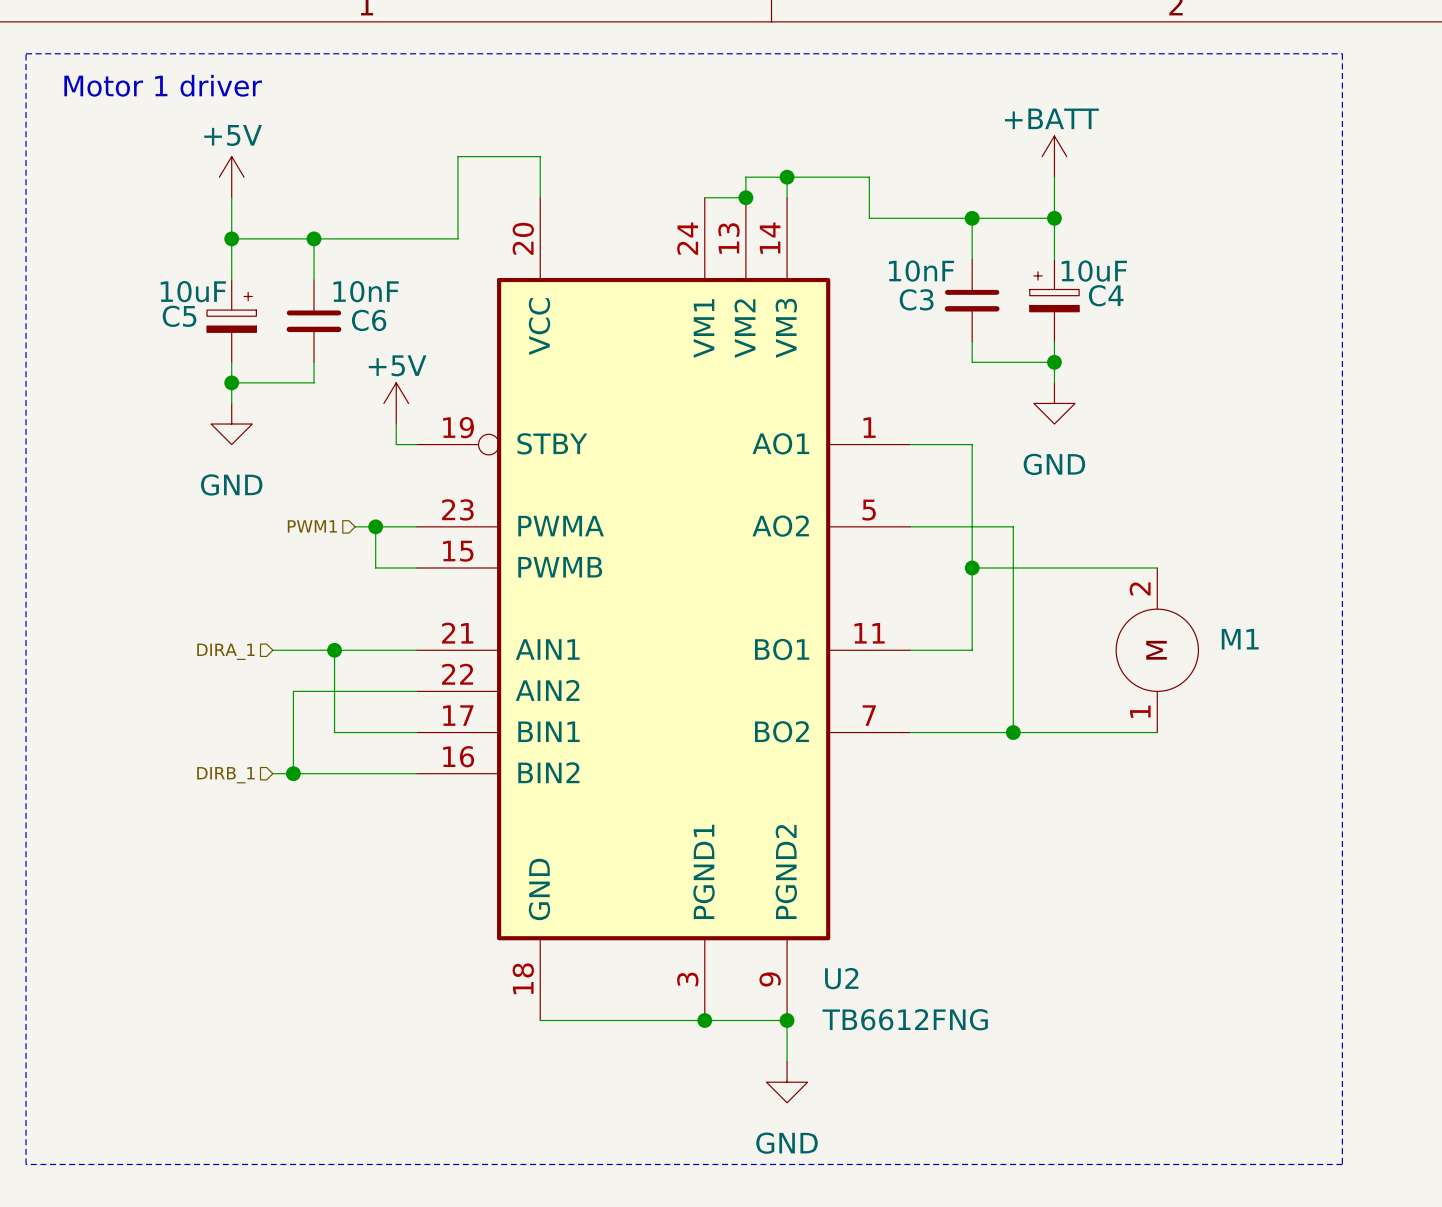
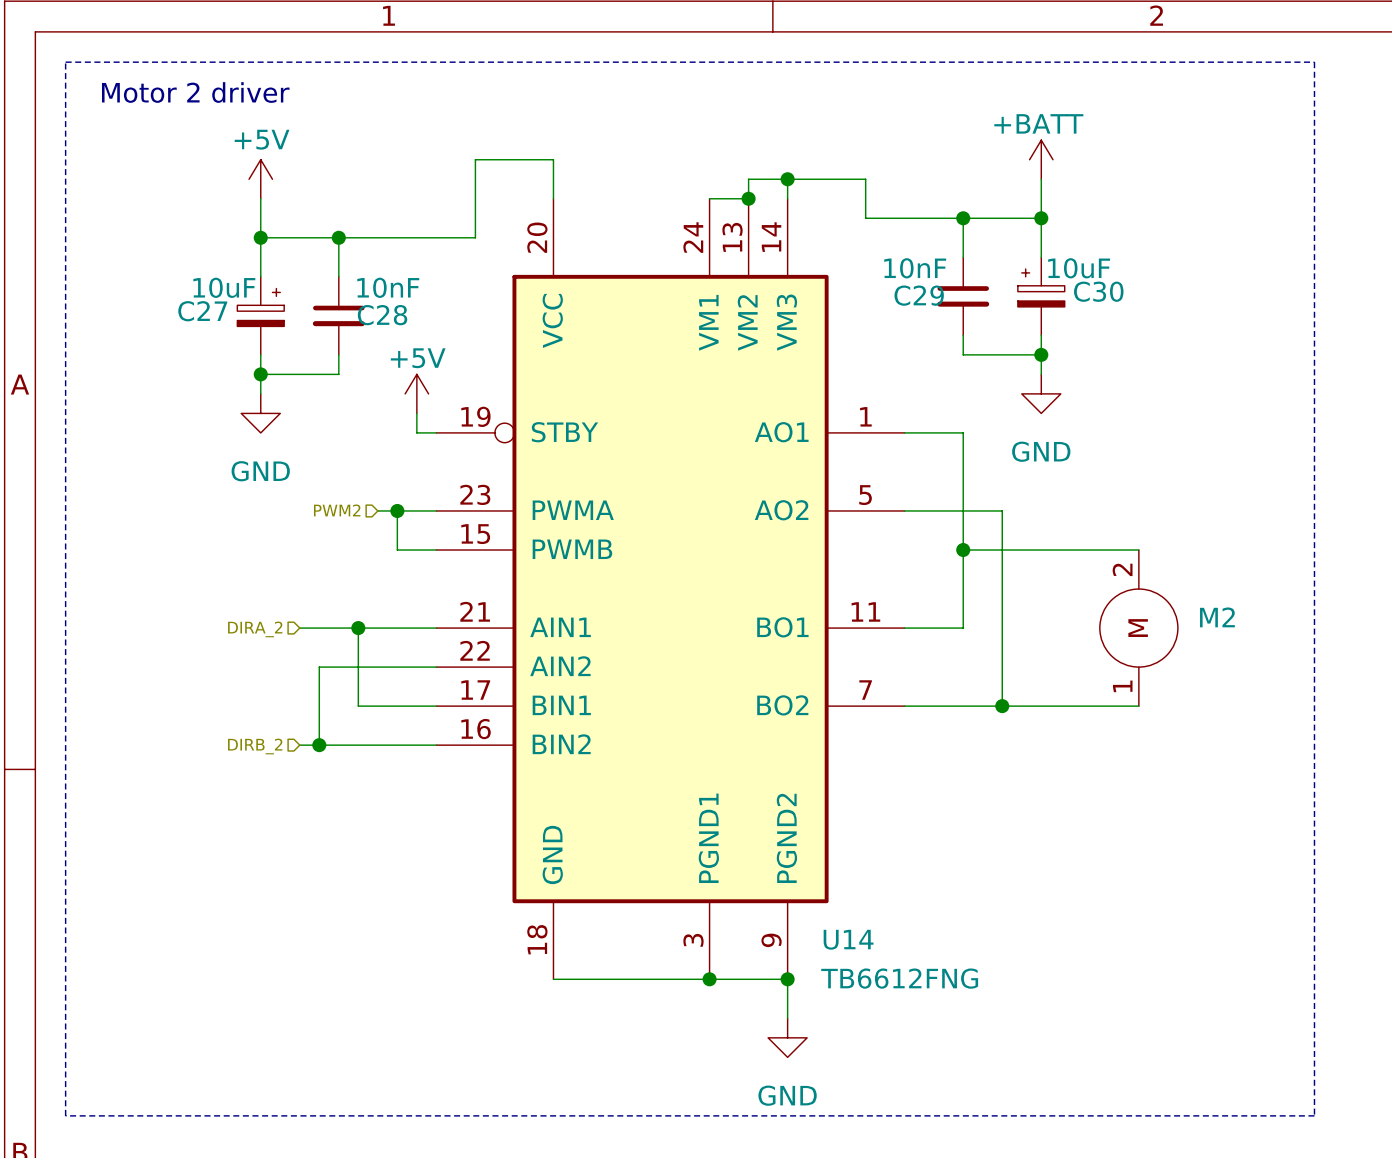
text: Motor 1 driver (163, 85) -> Motor 2 driver (195, 92)
C4 name: C4 (1106, 295) -> C30 (1098, 291)
C3 name: C3 (916, 299) -> C29 (919, 295)
C5 name: C5 (179, 316) -> C27 (202, 311)
C6 name: C6 (369, 320) -> C28 (382, 315)
hierarchical label: PWM1 (312, 526) -> PWM2 (337, 510)
M1 name: M1 (1240, 639) -> M2 (1217, 617)
hierarchical label: DIRA_1 (225, 651) -> DIRA_2 (255, 629)
hierarchical label: DIRB_1 (225, 775) -> DIRB_2 (255, 746)
U2 name: U2 (841, 978) -> U14 (848, 939)

